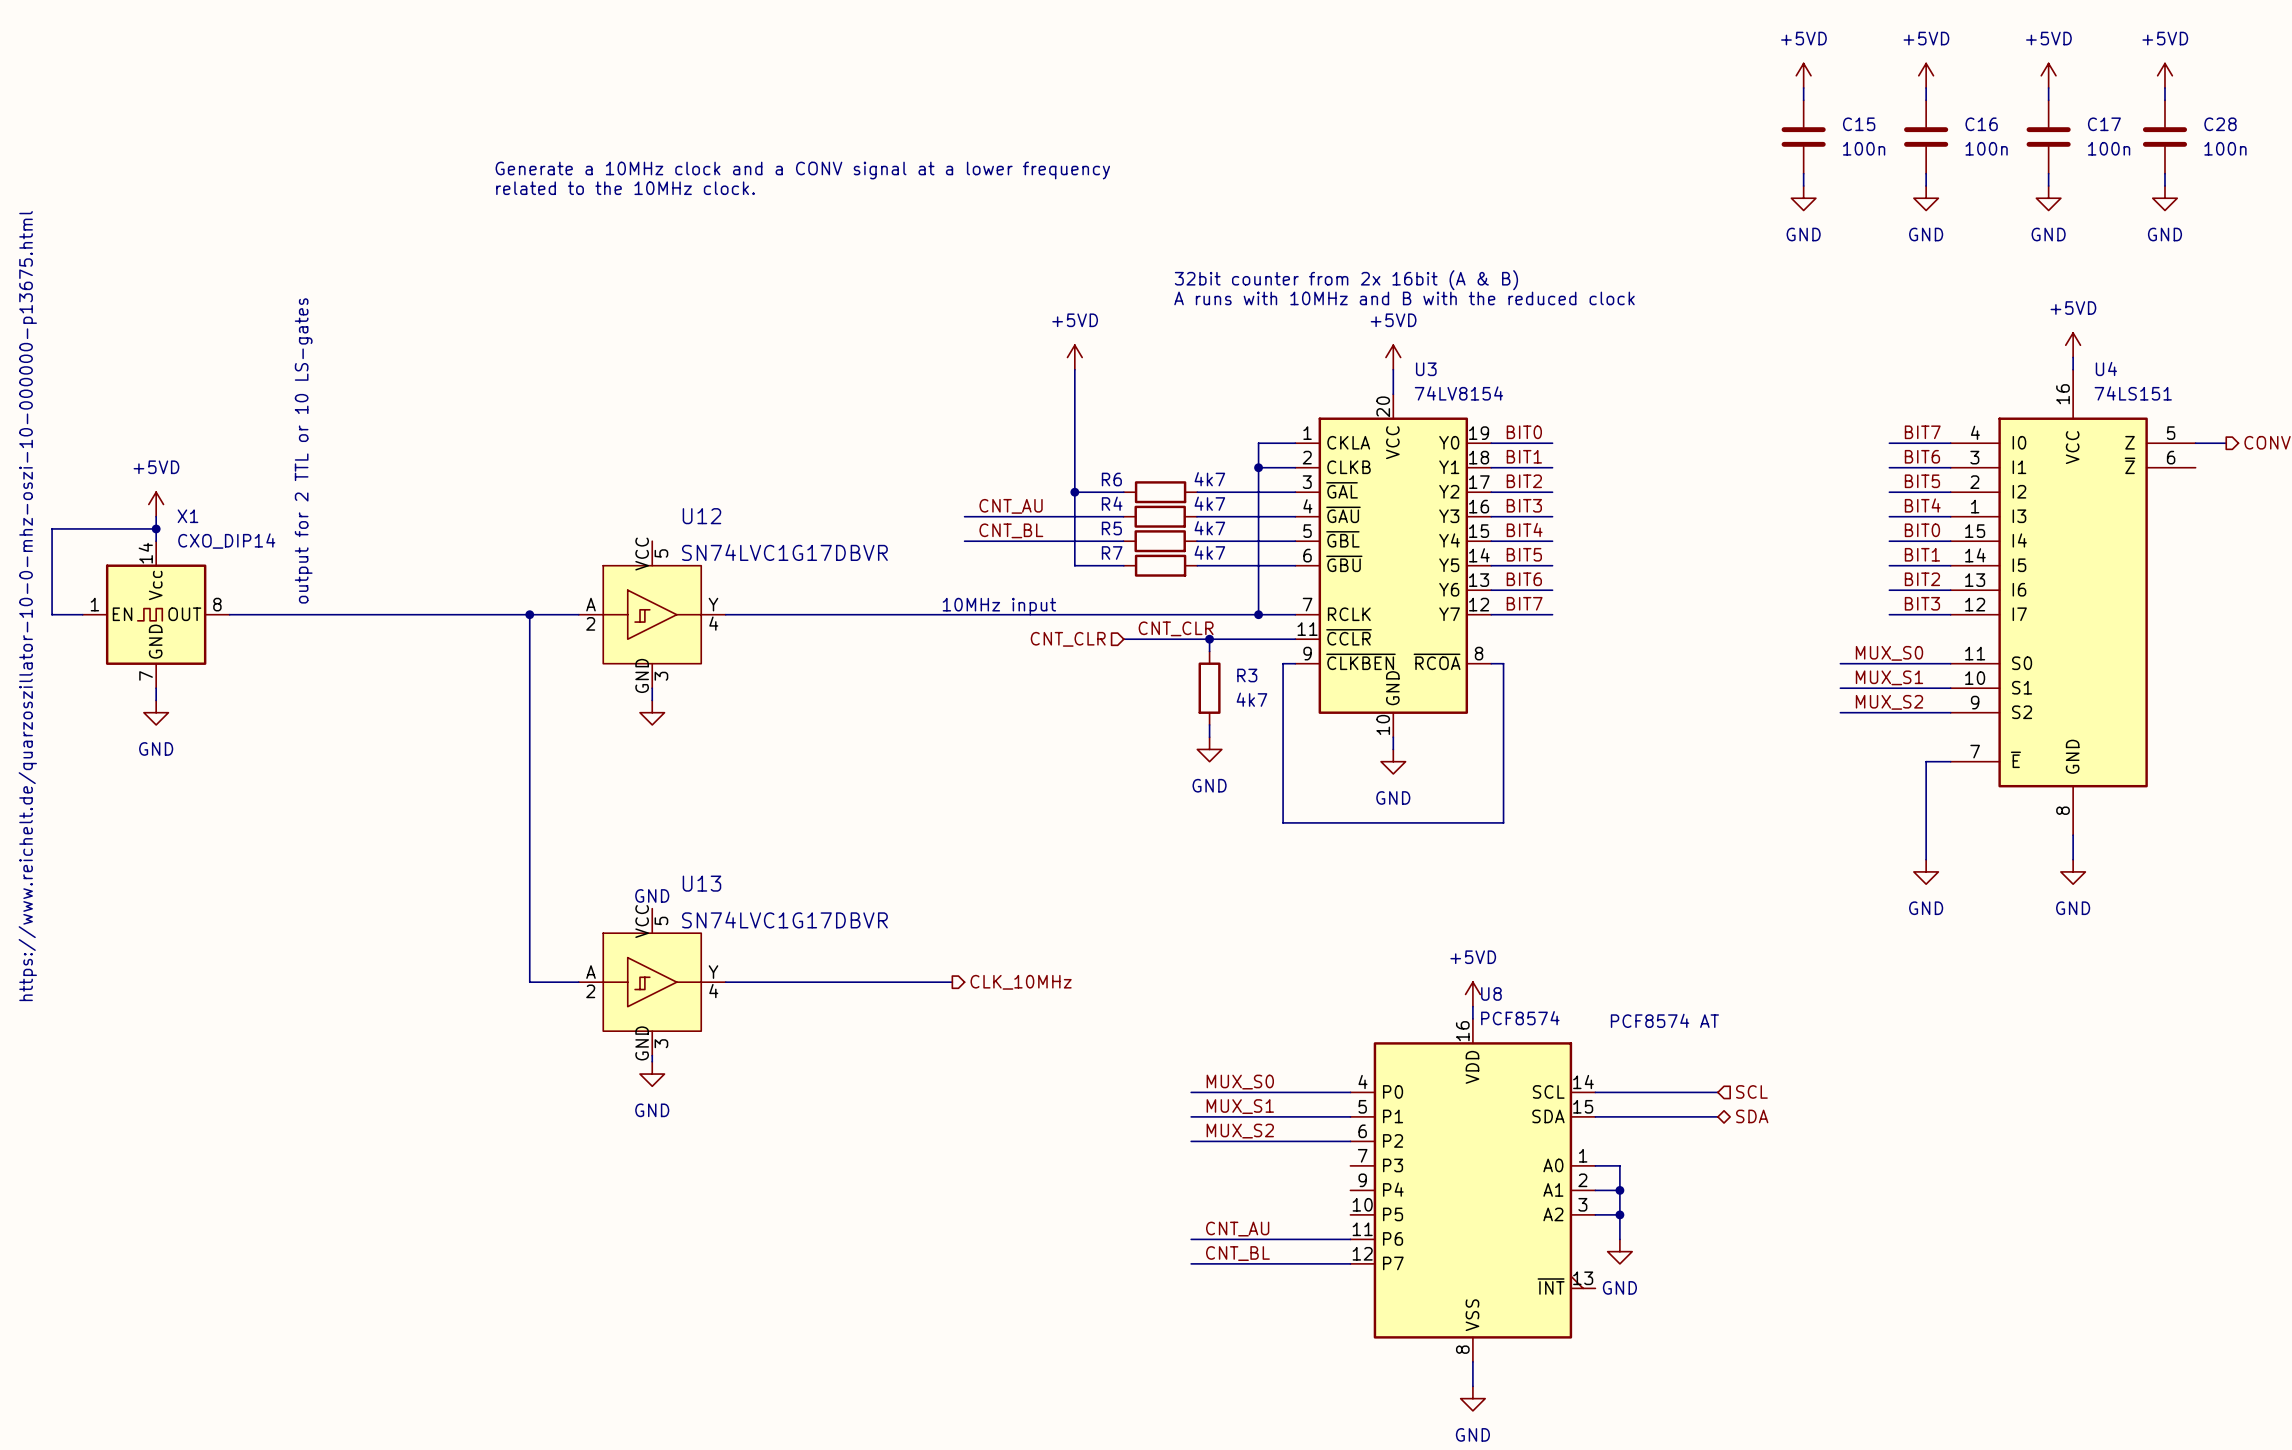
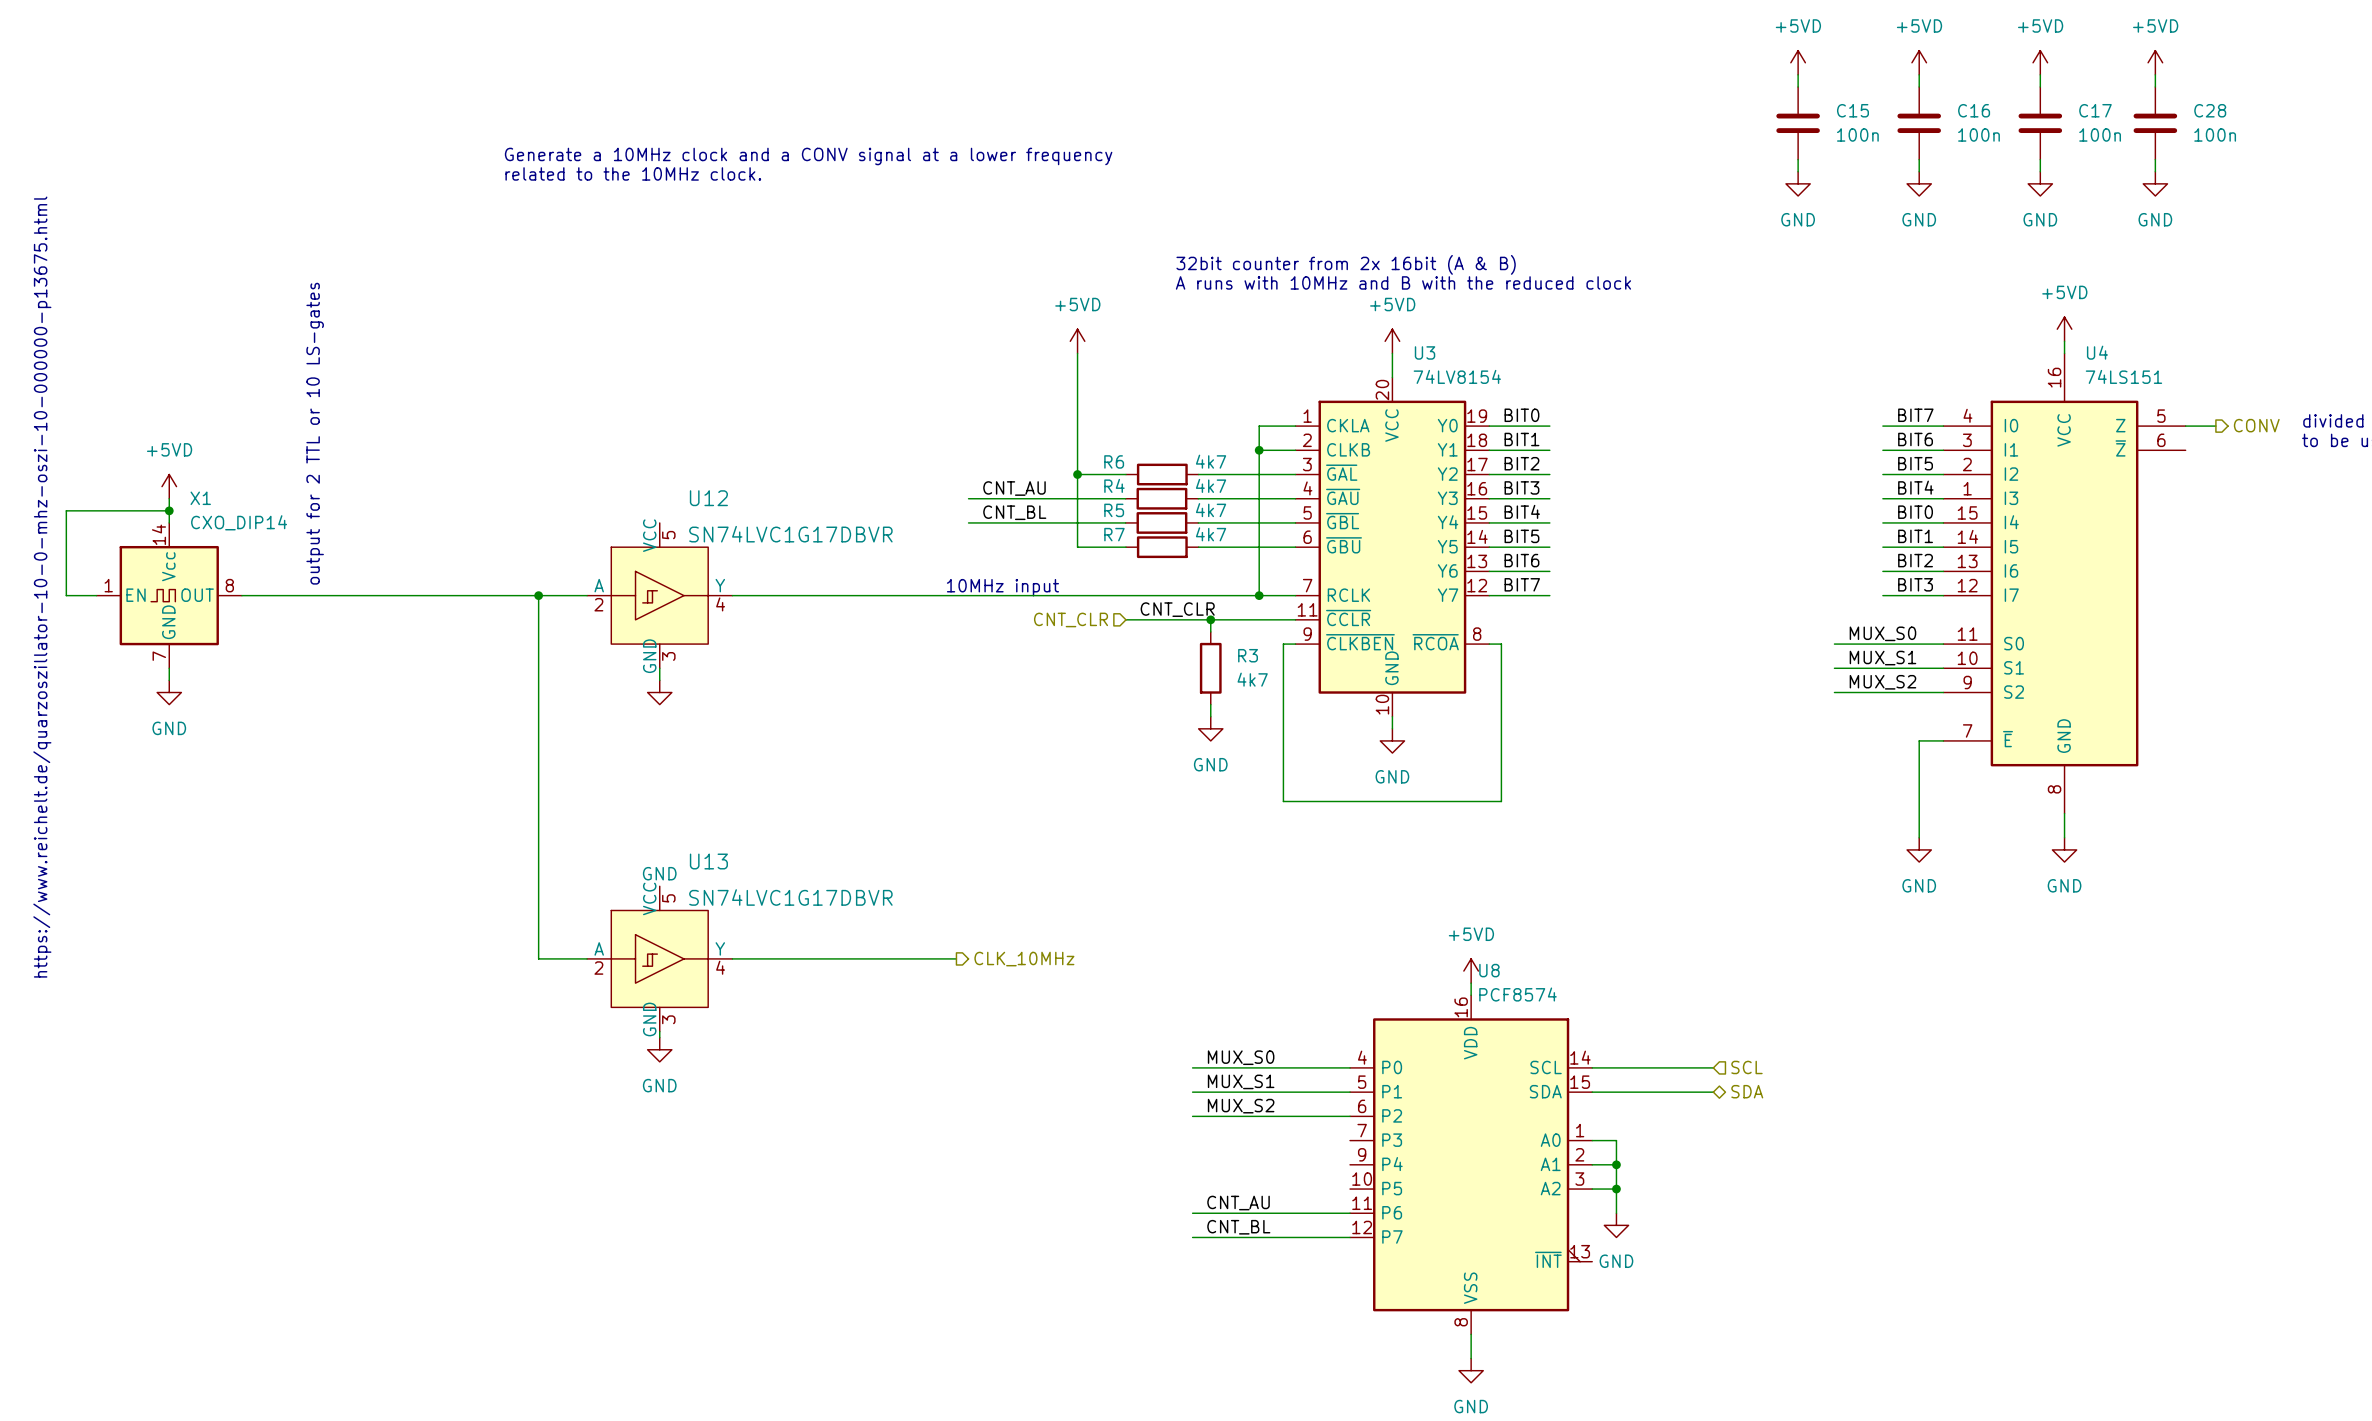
text: PCF8574 AT (1664, 1020) -> none

